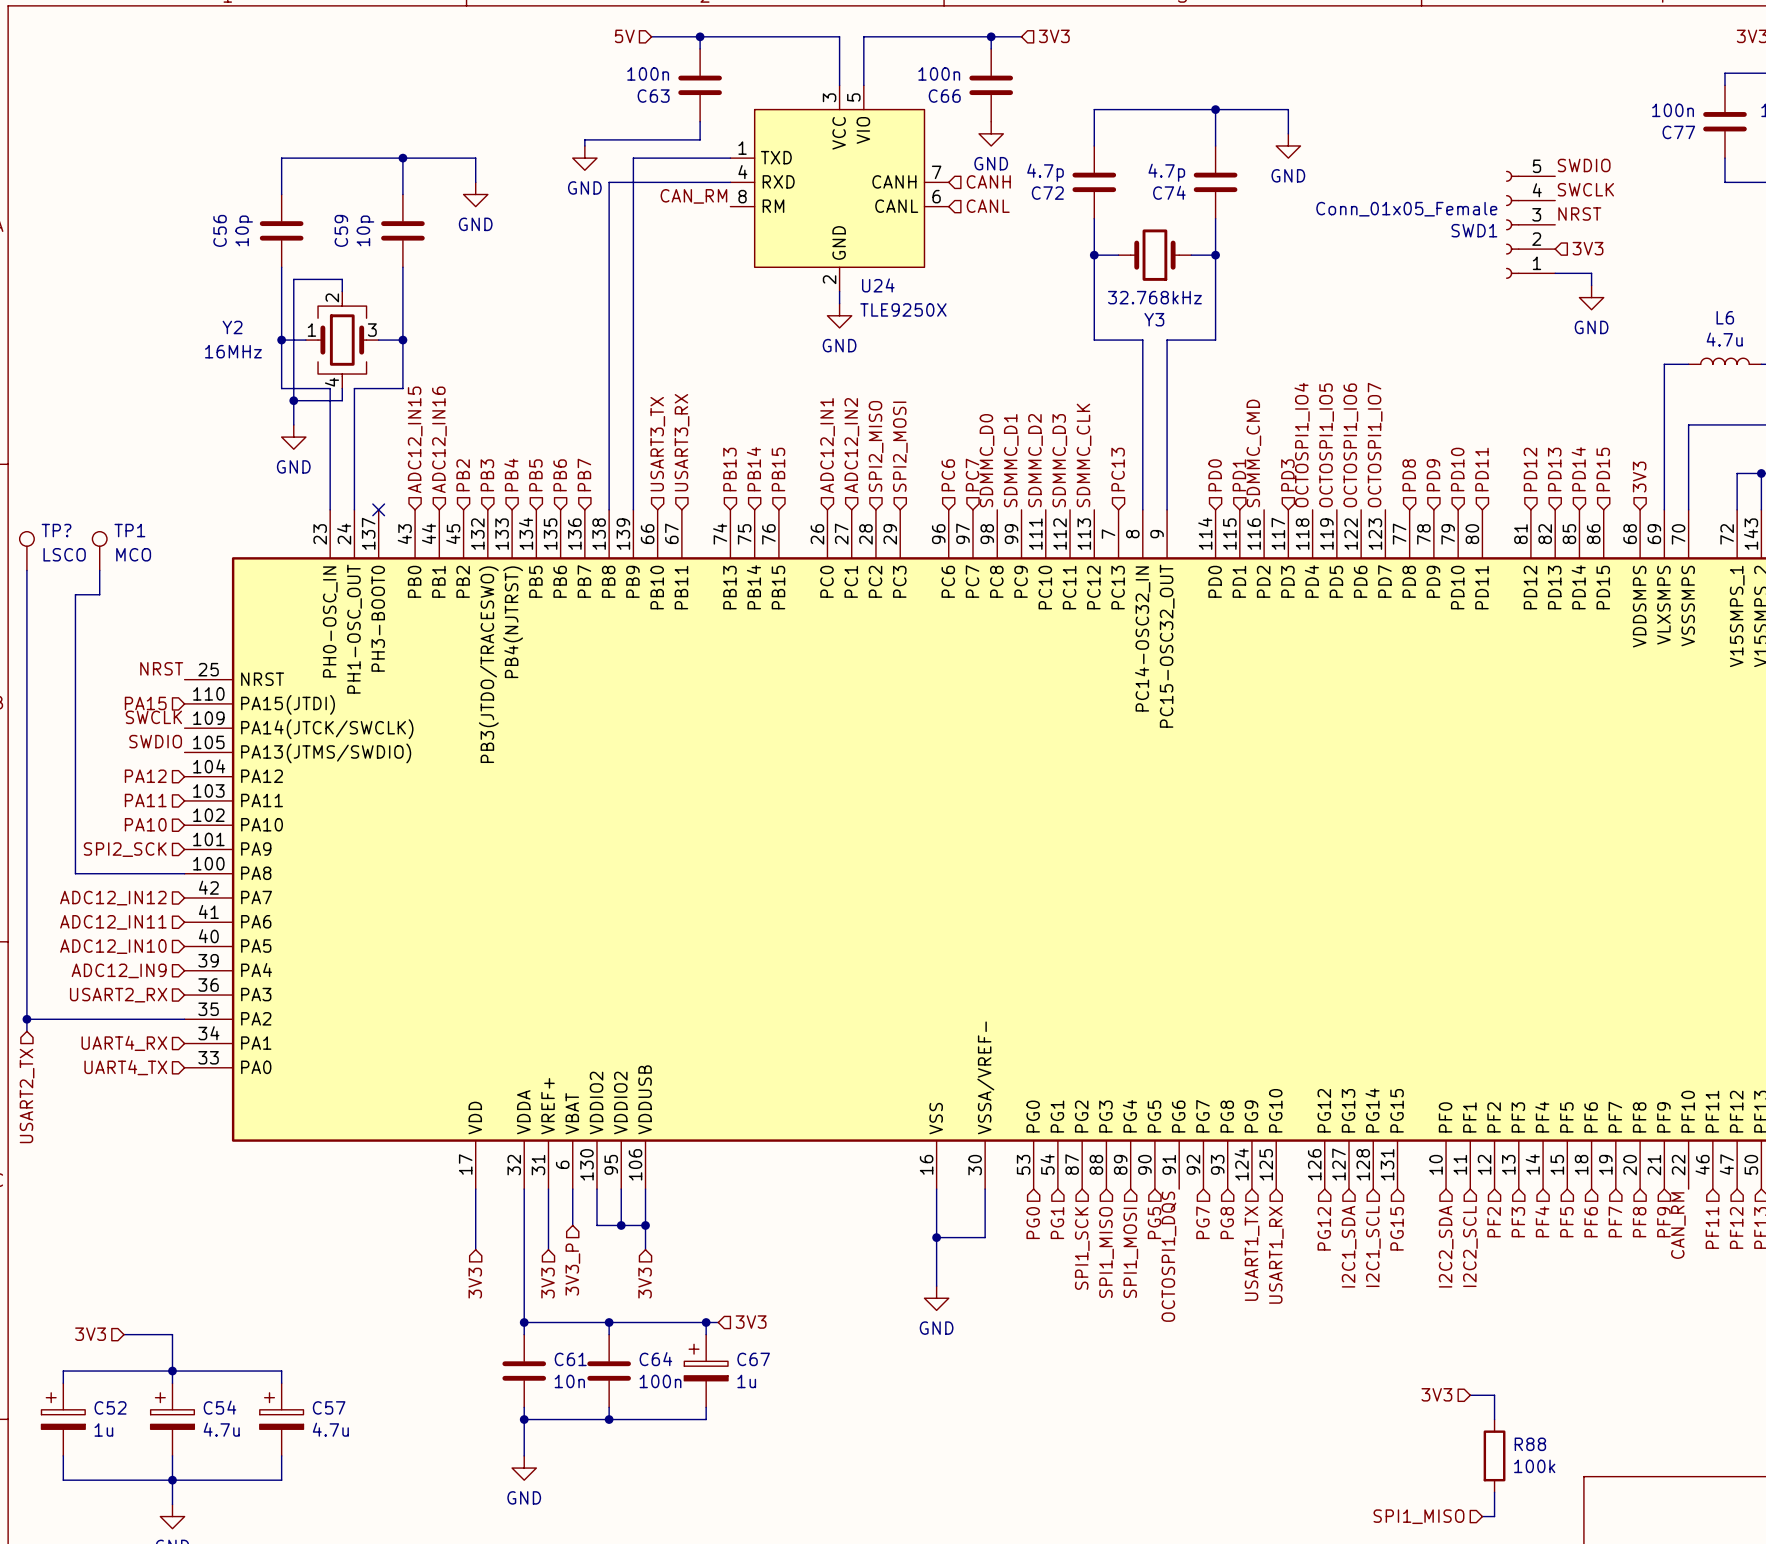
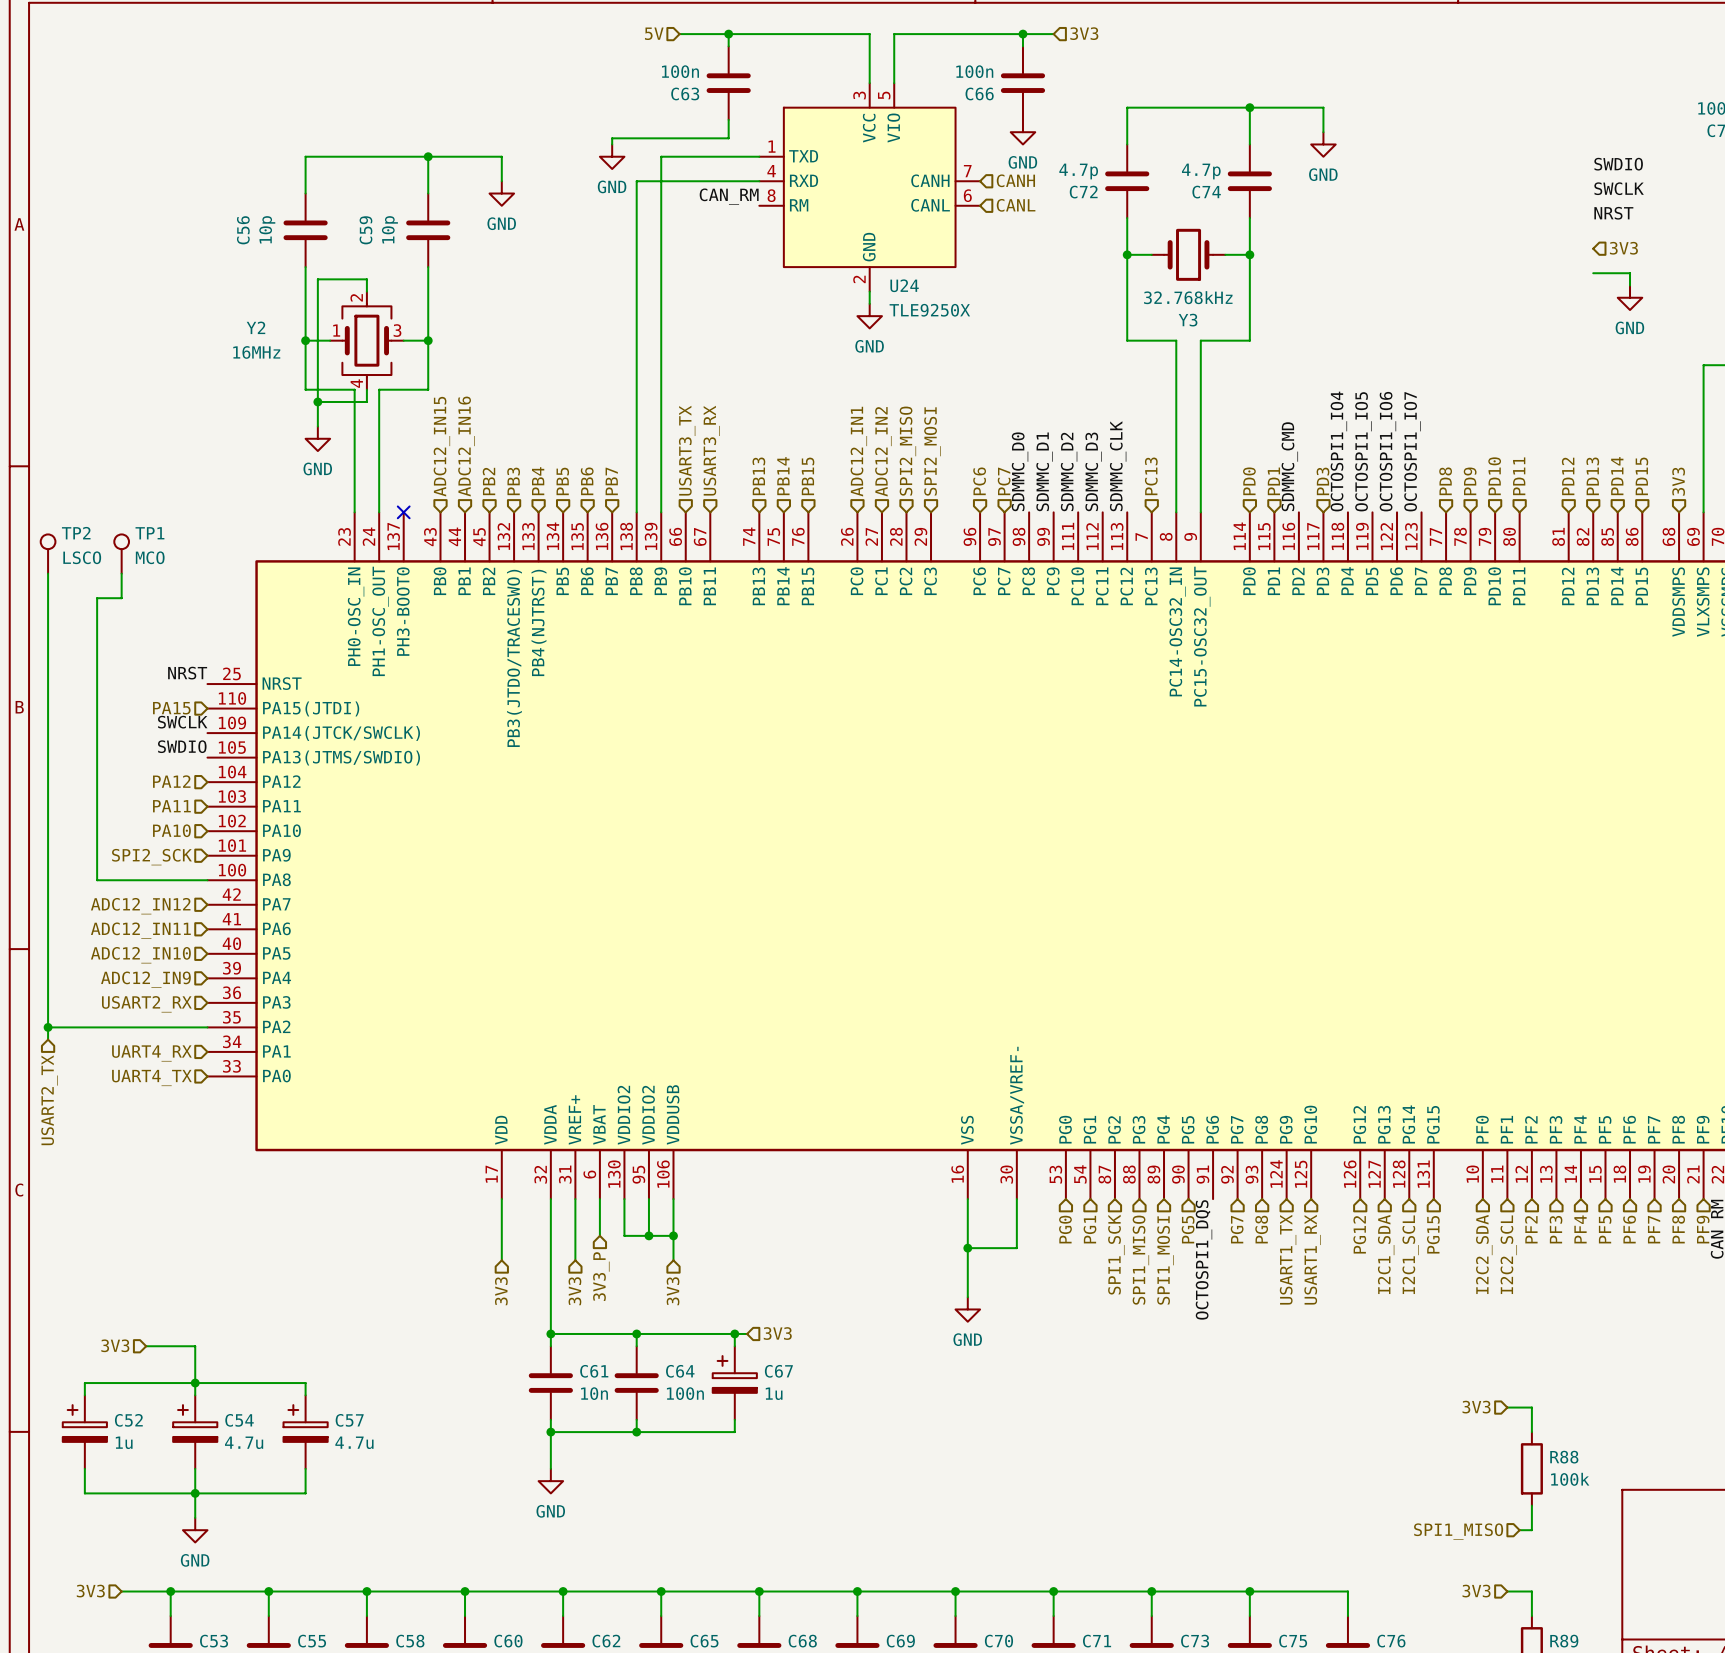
SWD1: Conn_01x05_Female (1530, 224) -> none
TP? name: TP? (56, 530) -> TP2 (76, 533)

